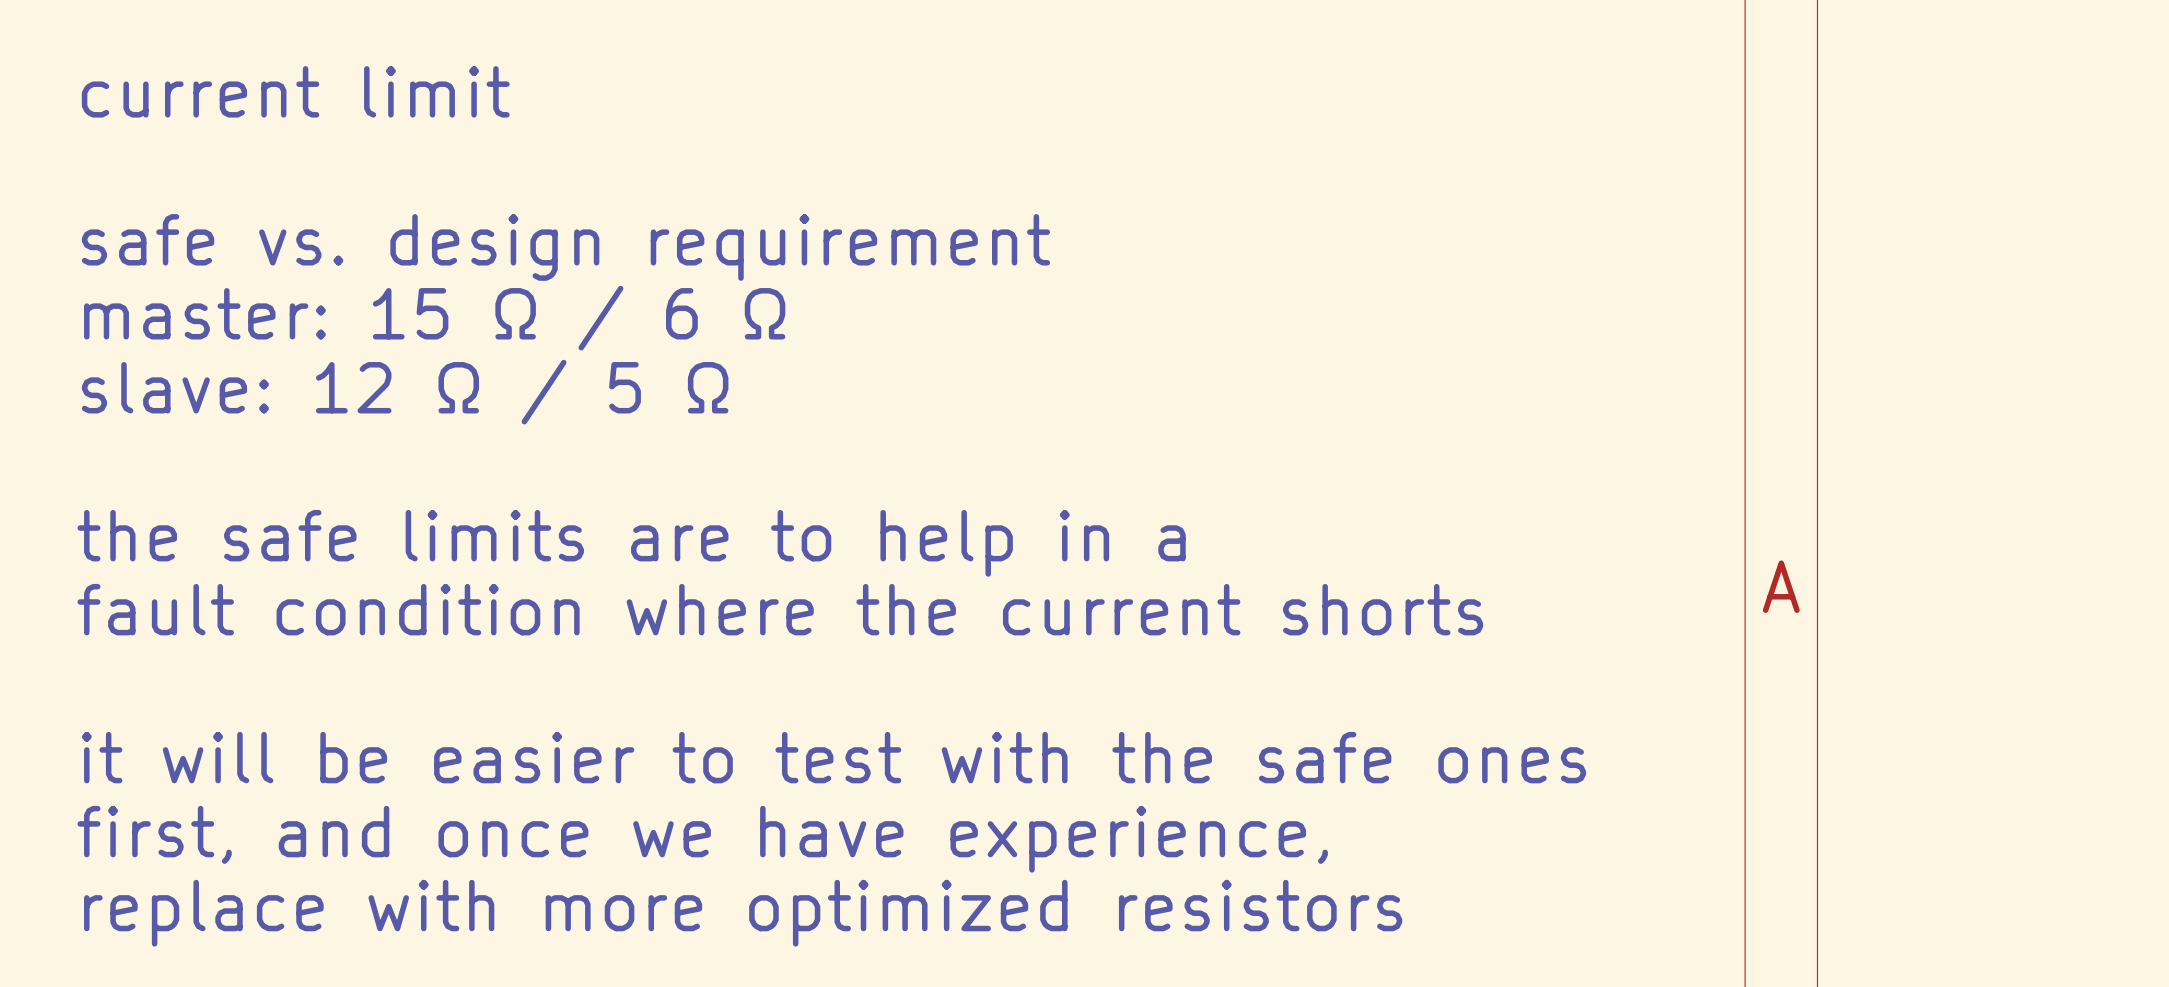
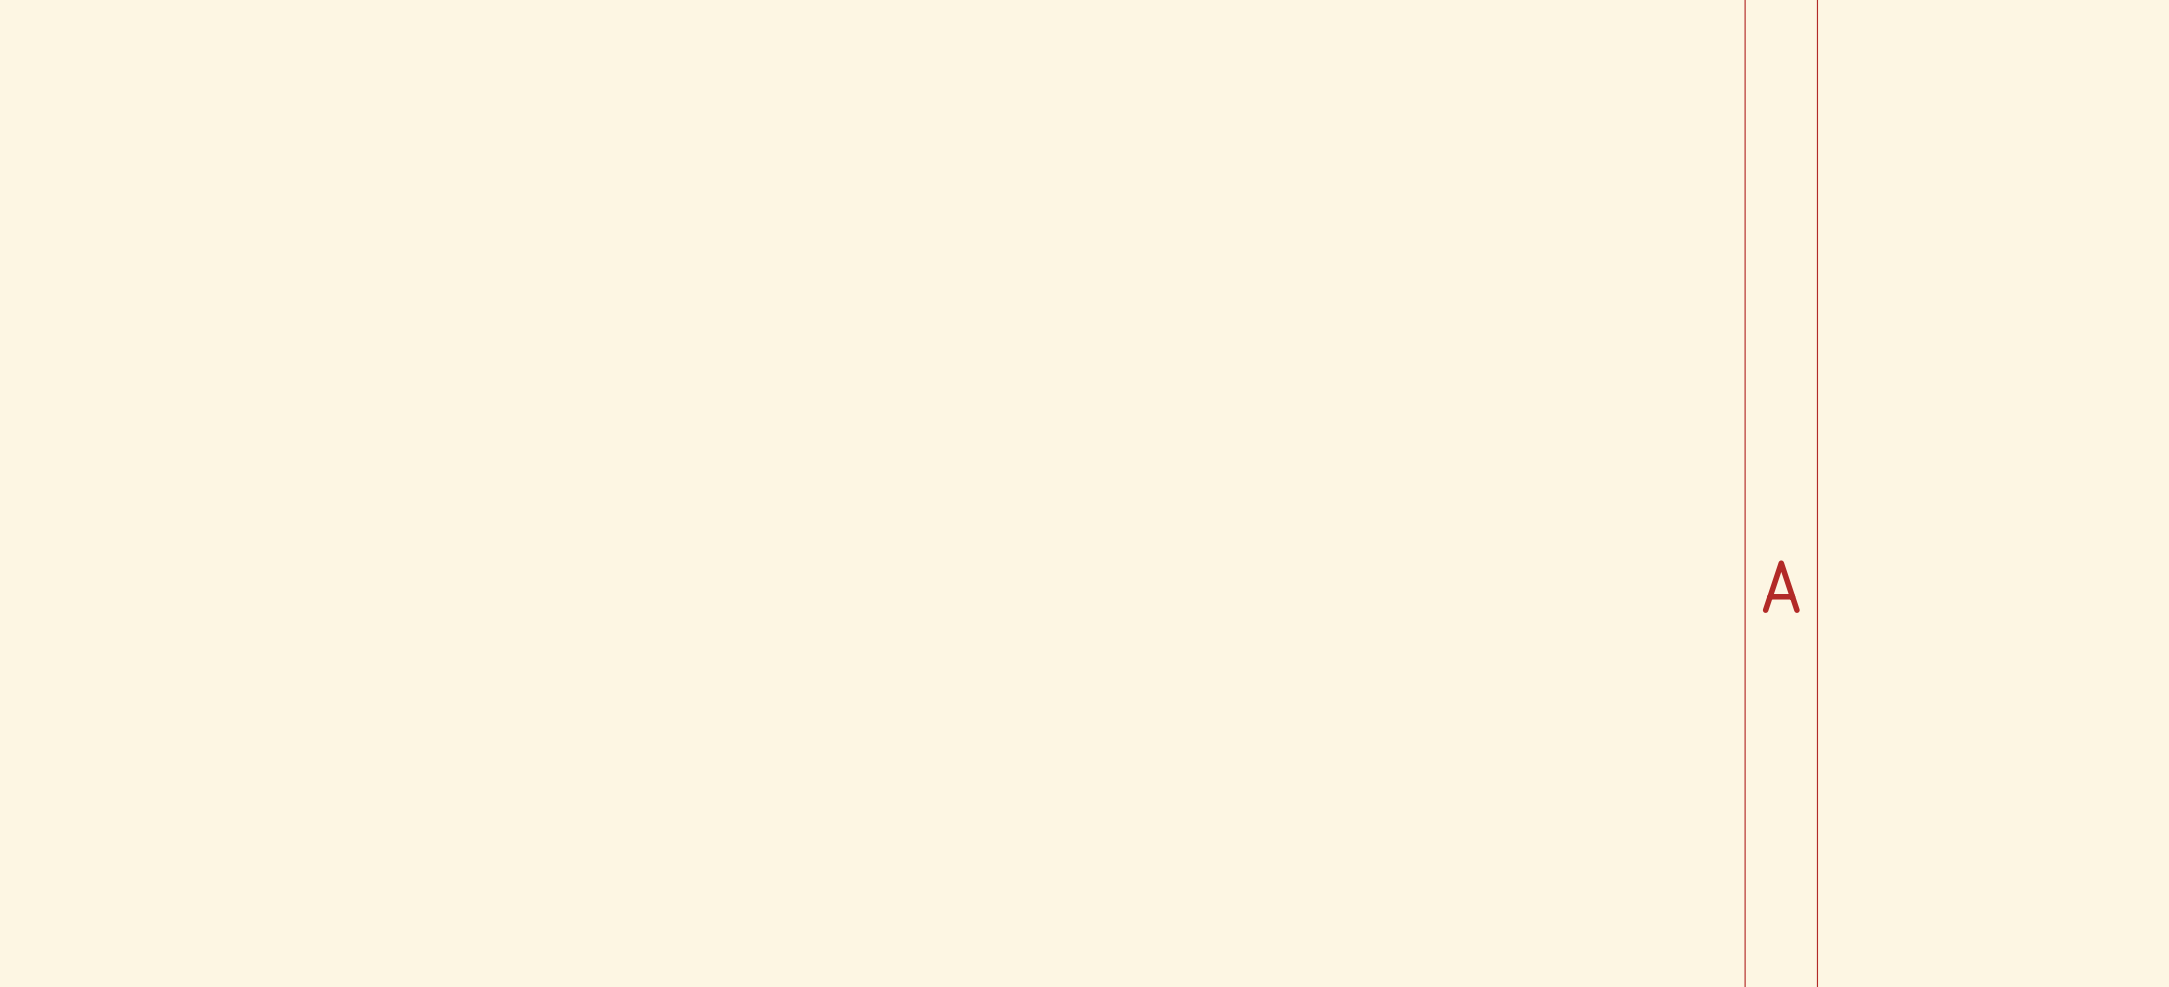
text: current limit (295, 91) -> none
text: safe vs. design requirement (565, 247) -> none
text: master: 15 Ω / 6 Ω (434, 318) -> none
text: slave: 12 Ω / 5 Ω (405, 392) -> none
text: the safe limits are to help in a (631, 543) -> none
text: fault condition where the current shorts (780, 609) -> none
text: it will be easier to test with the safe ones (833, 757) -> none
text: first, and once we have experience, (702, 839) -> none
text: replace with more optimized resistors (743, 913) -> none

